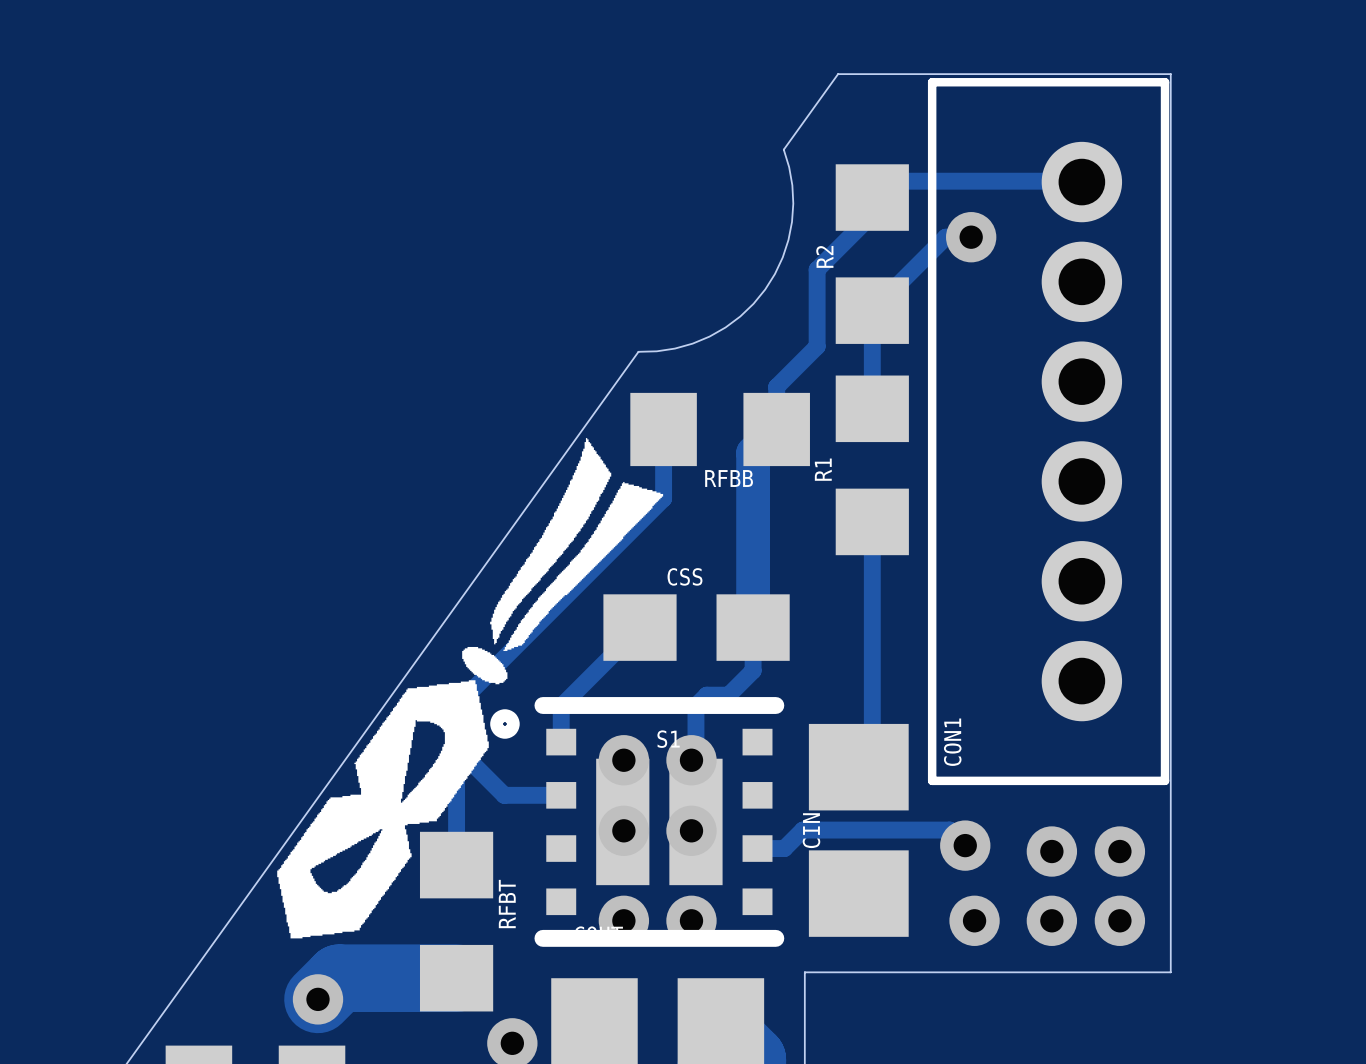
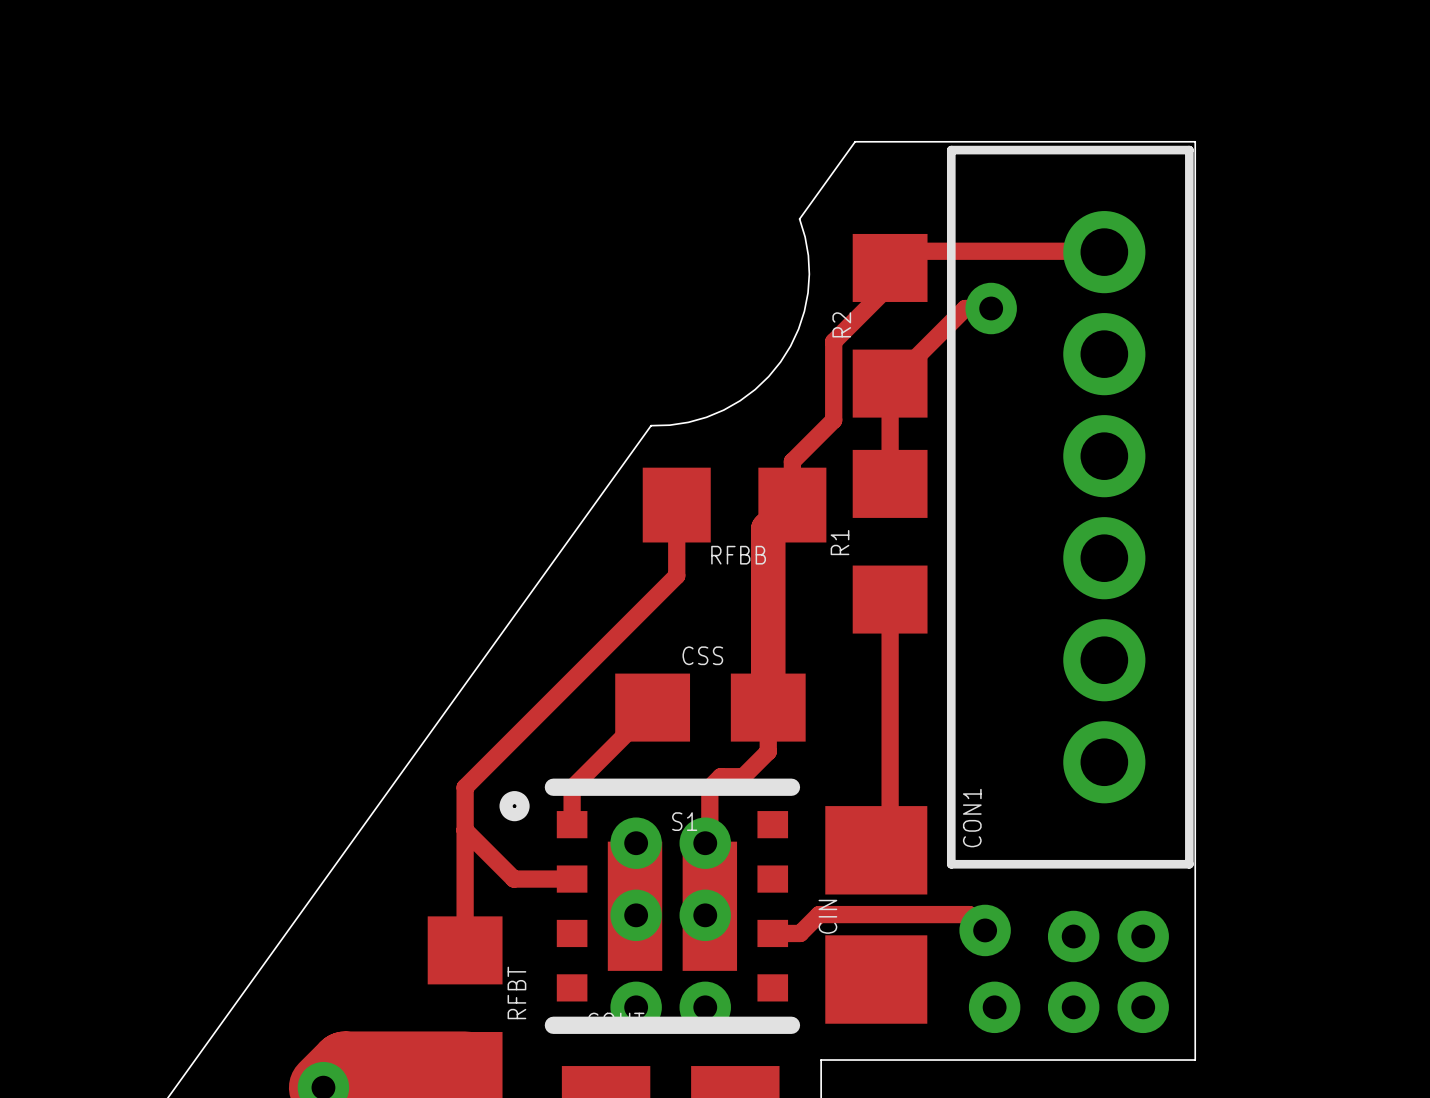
drawing: [277, 438, 664, 939] -> none

